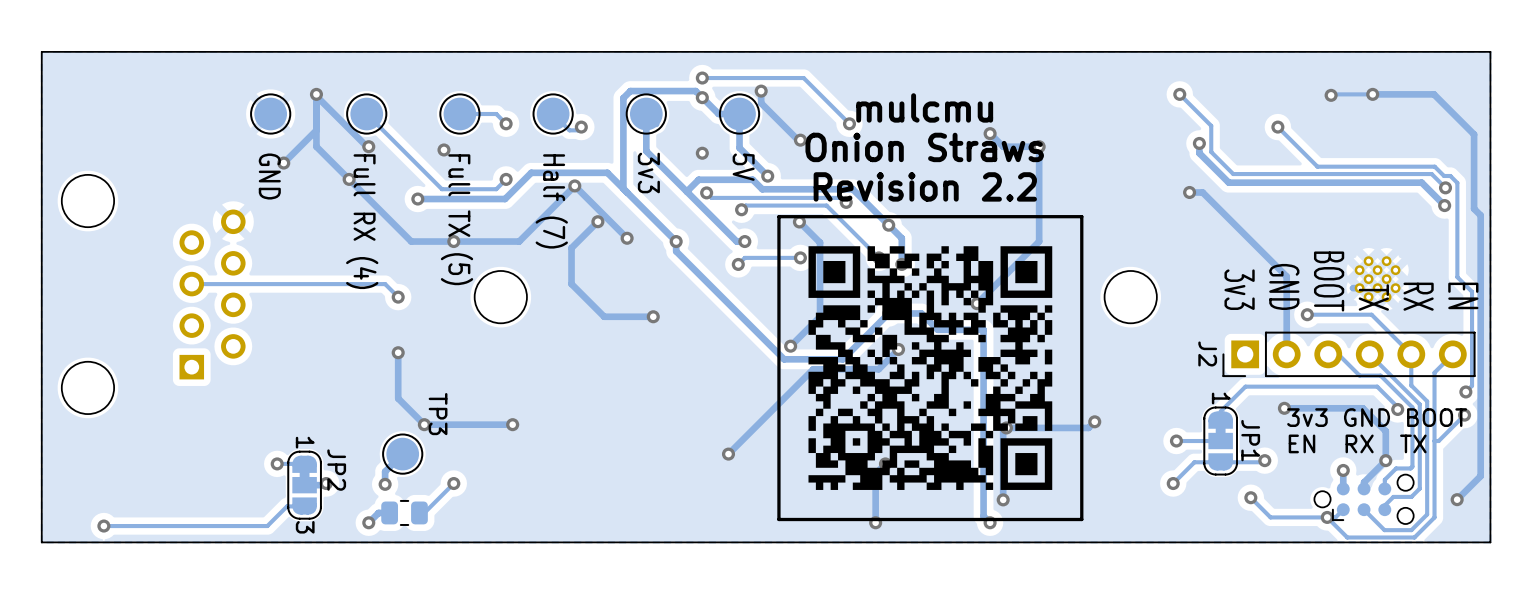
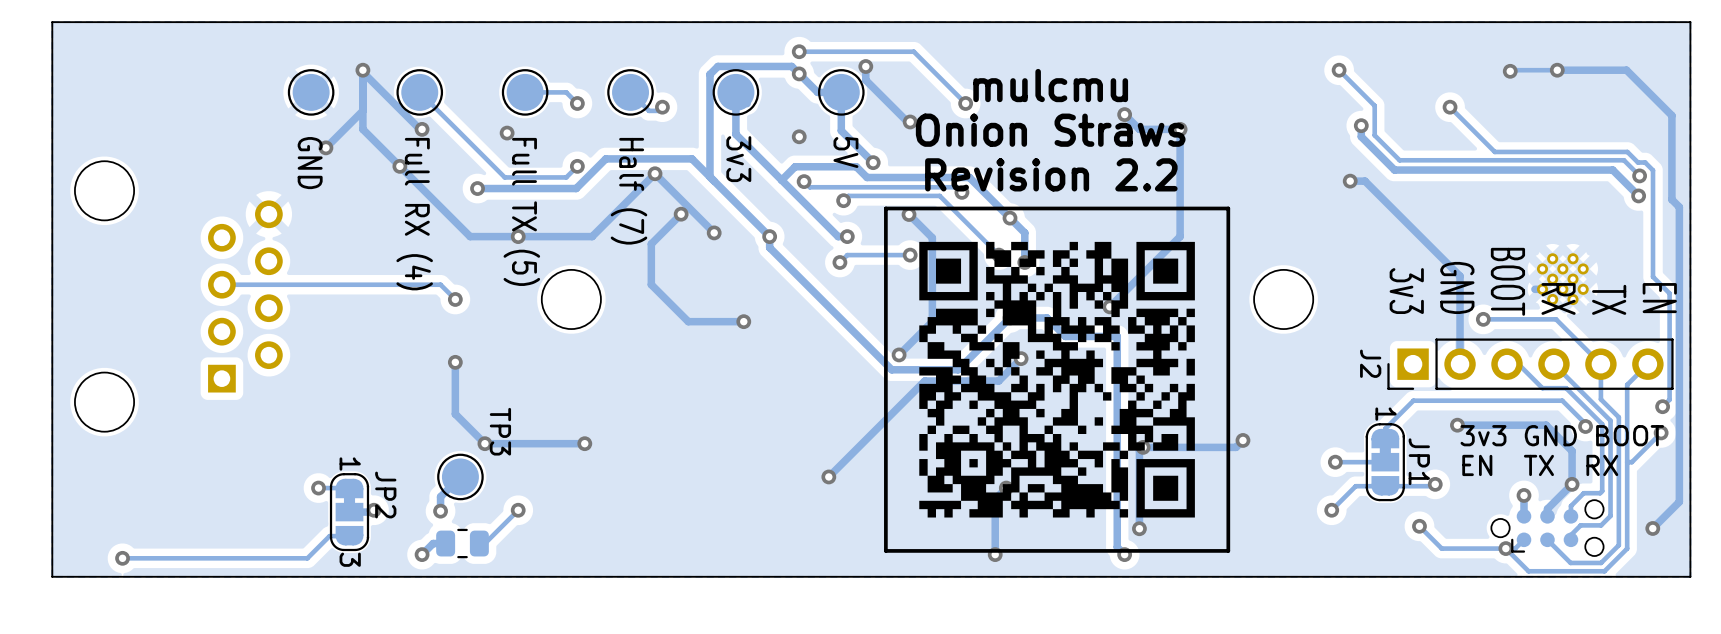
text: RX (1418, 296) -> TX (1609, 299)
text: TX (1373, 297) -> RX (1558, 298)
text: EN RX TX (1357, 443) -> EN TX RX (1540, 465)

